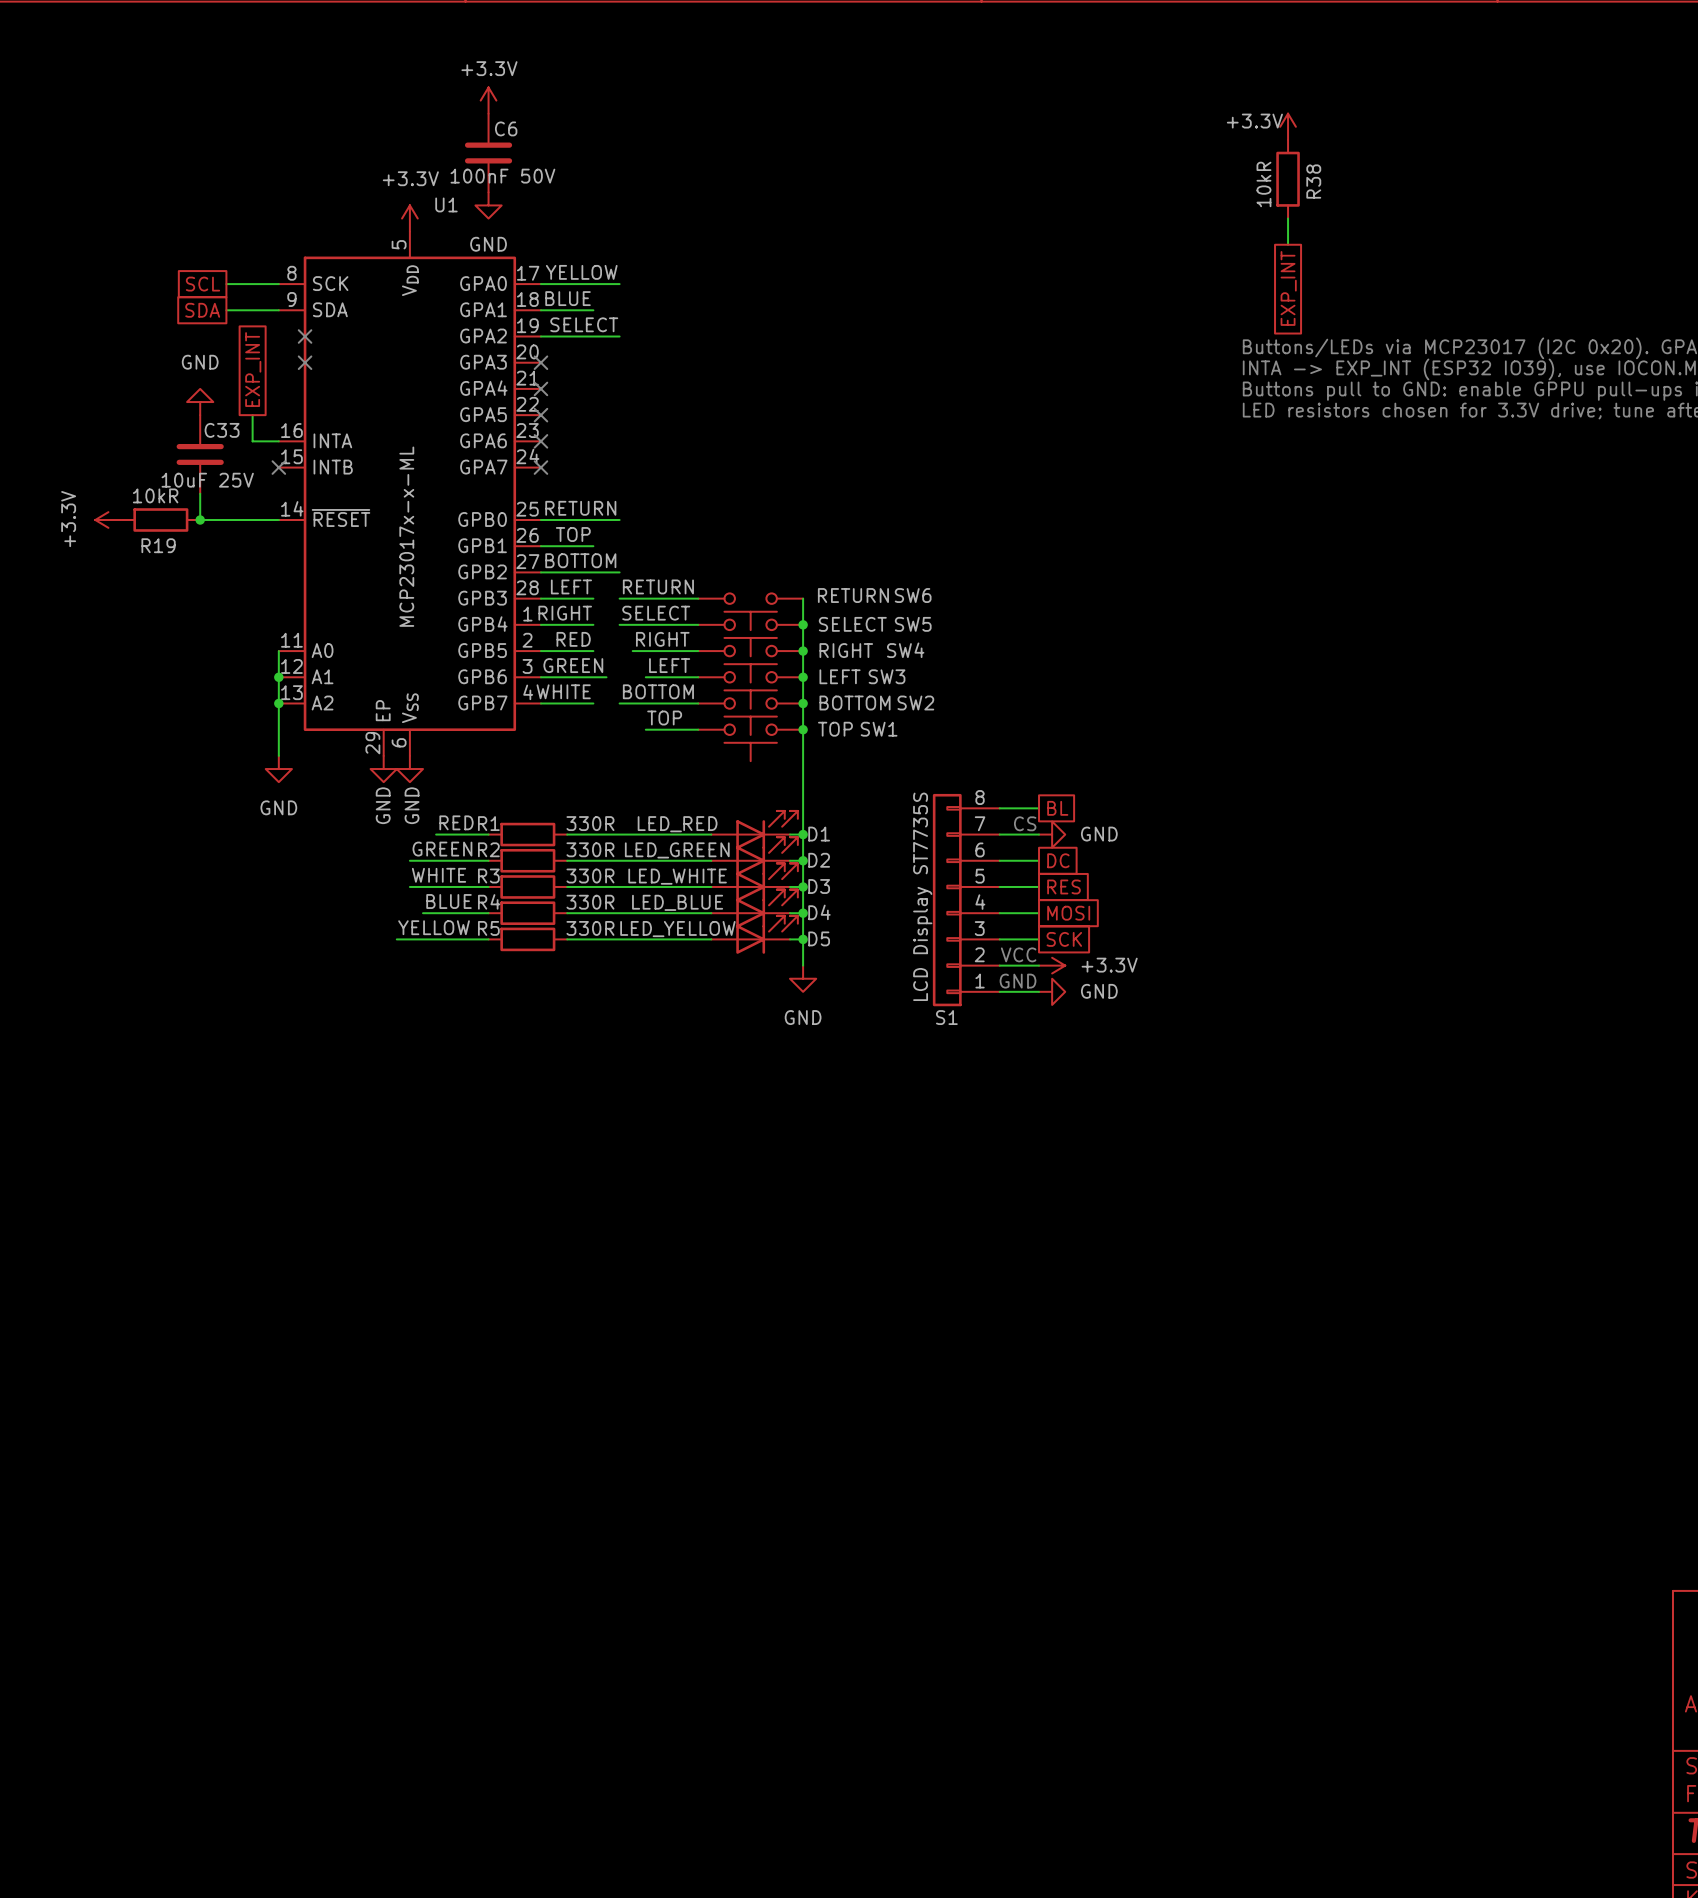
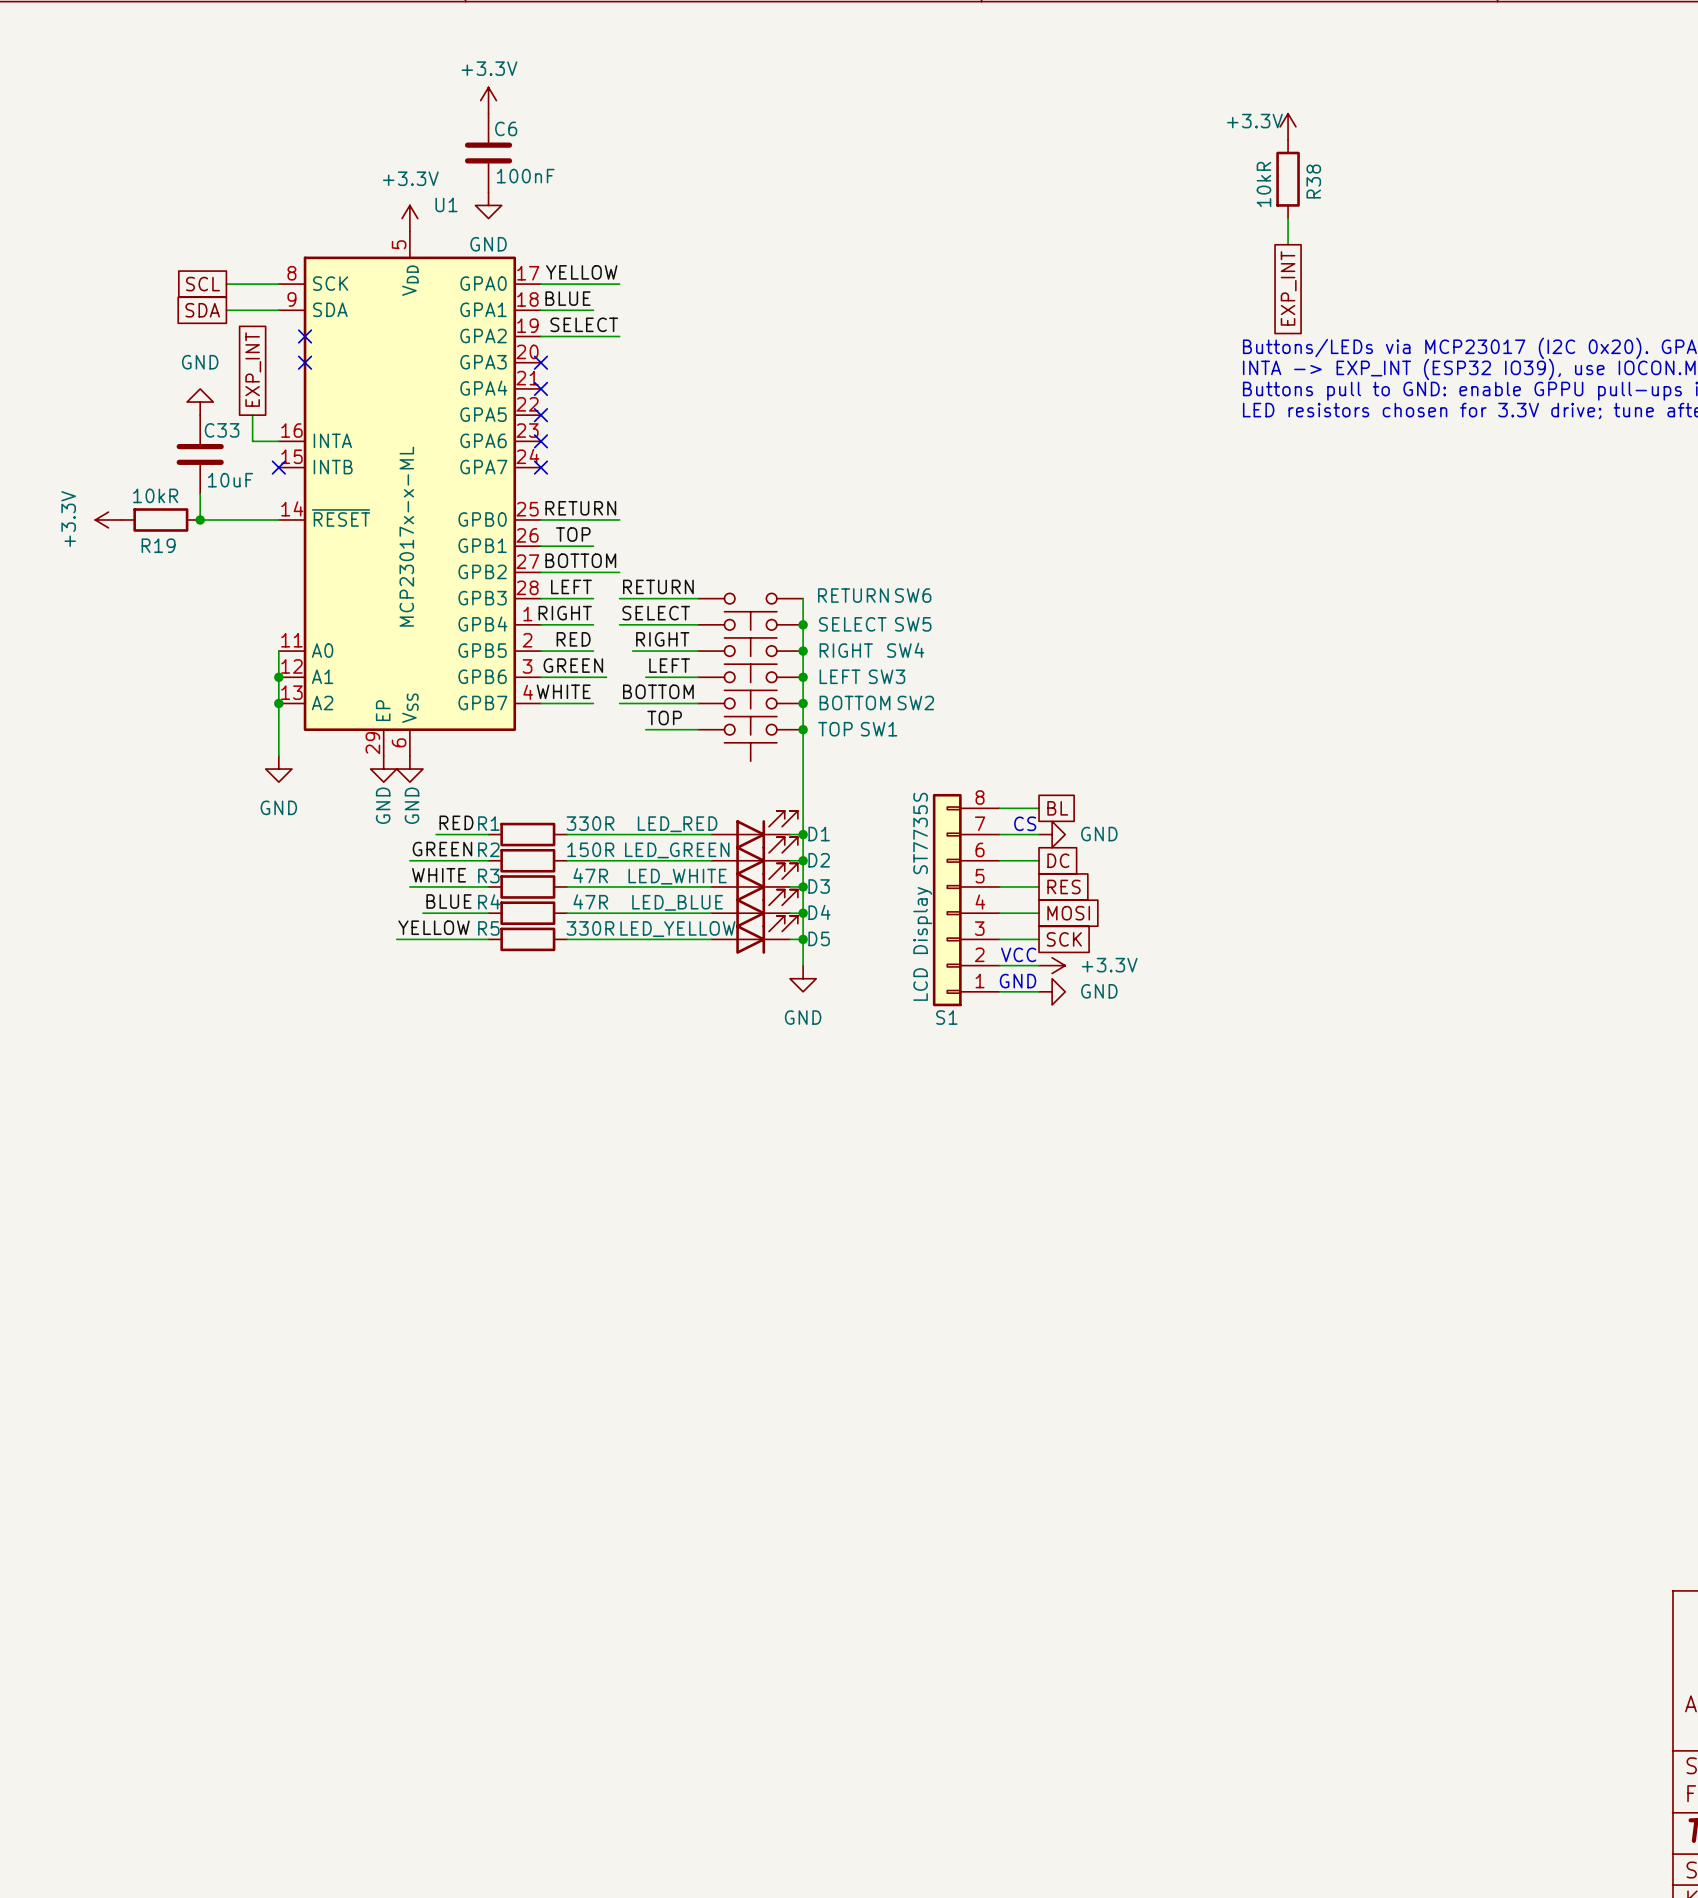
C6 value: 100nF 50V (502, 176) -> 100nF (525, 176)
C33 value: 10uF 25V (207, 480) -> 10uF (230, 480)
R2 value: 330R (590, 849) -> 150R (590, 849)
R3 value: 330R (590, 876) -> 47R (590, 875)
R4 value: 330R (590, 902) -> 47R (590, 901)

